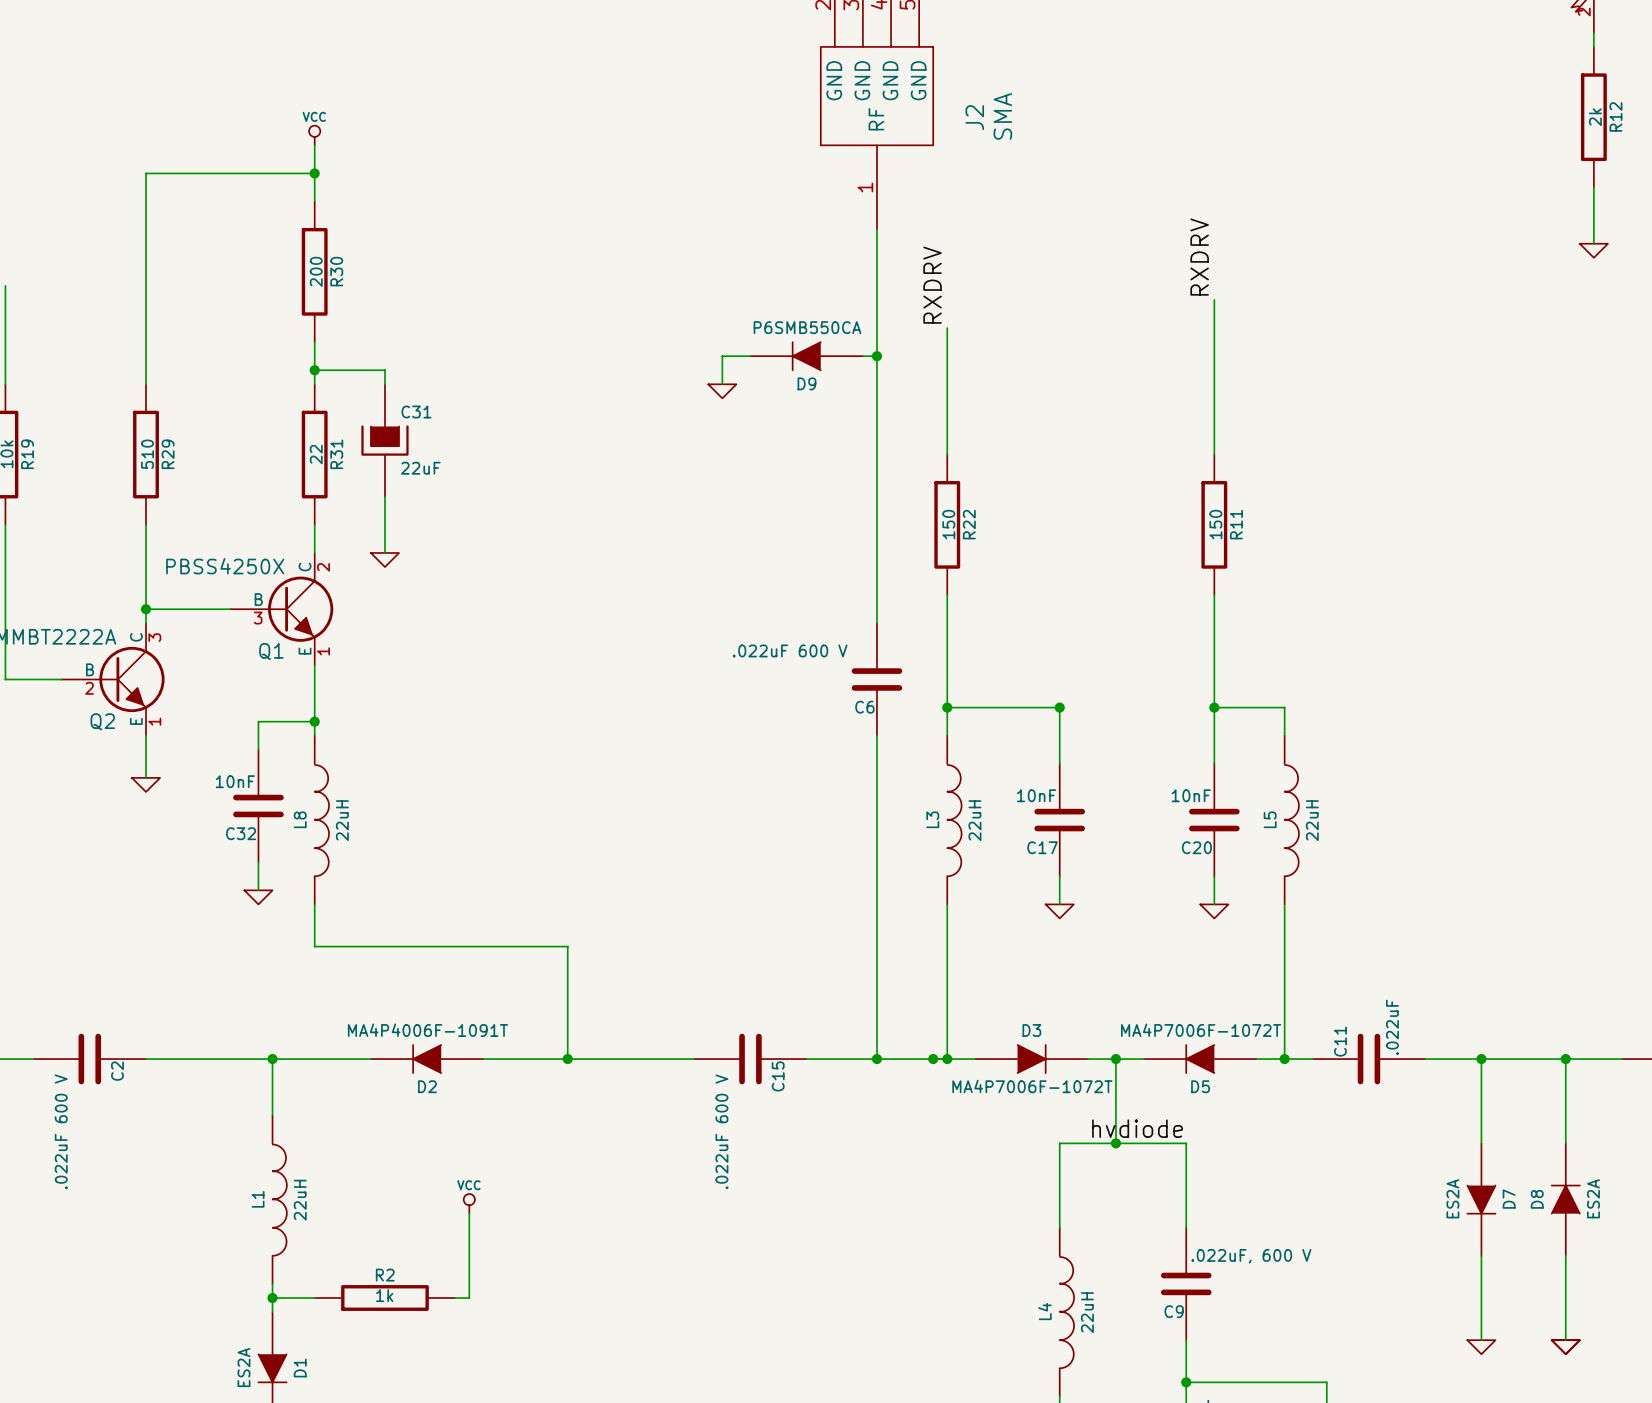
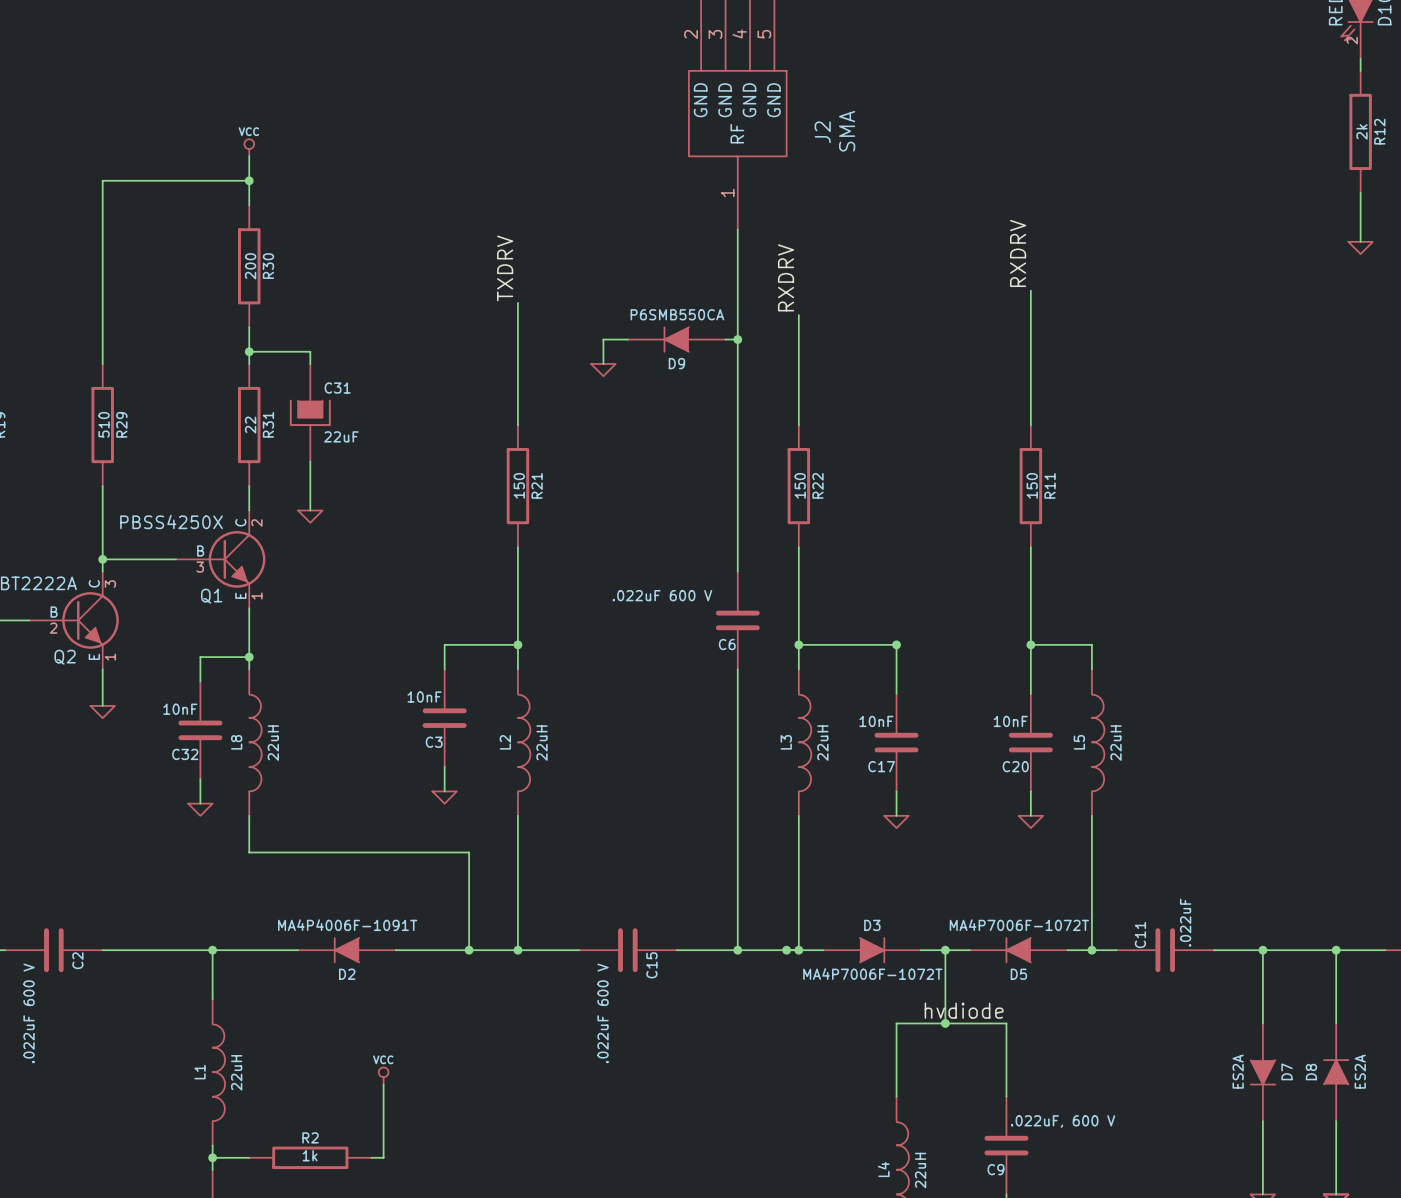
label: none -> TXDRV (505, 268)
wire: none -> (517, 302) (517, 425)
R21: none -> 150 (517, 486)
wire: none -> (517, 547) (517, 669)
wire: none -> (517, 644) (444, 644) (444, 669)
junction: none -> (517, 644)
C3: none -> 10nF (444, 718)
L2: none -> 22uH (524, 742)
wire: none -> (444, 767) (444, 791)
power symbol: none -> (444, 797)
wire: none -> (517, 815) (517, 950)
junction: none -> (517, 950)

